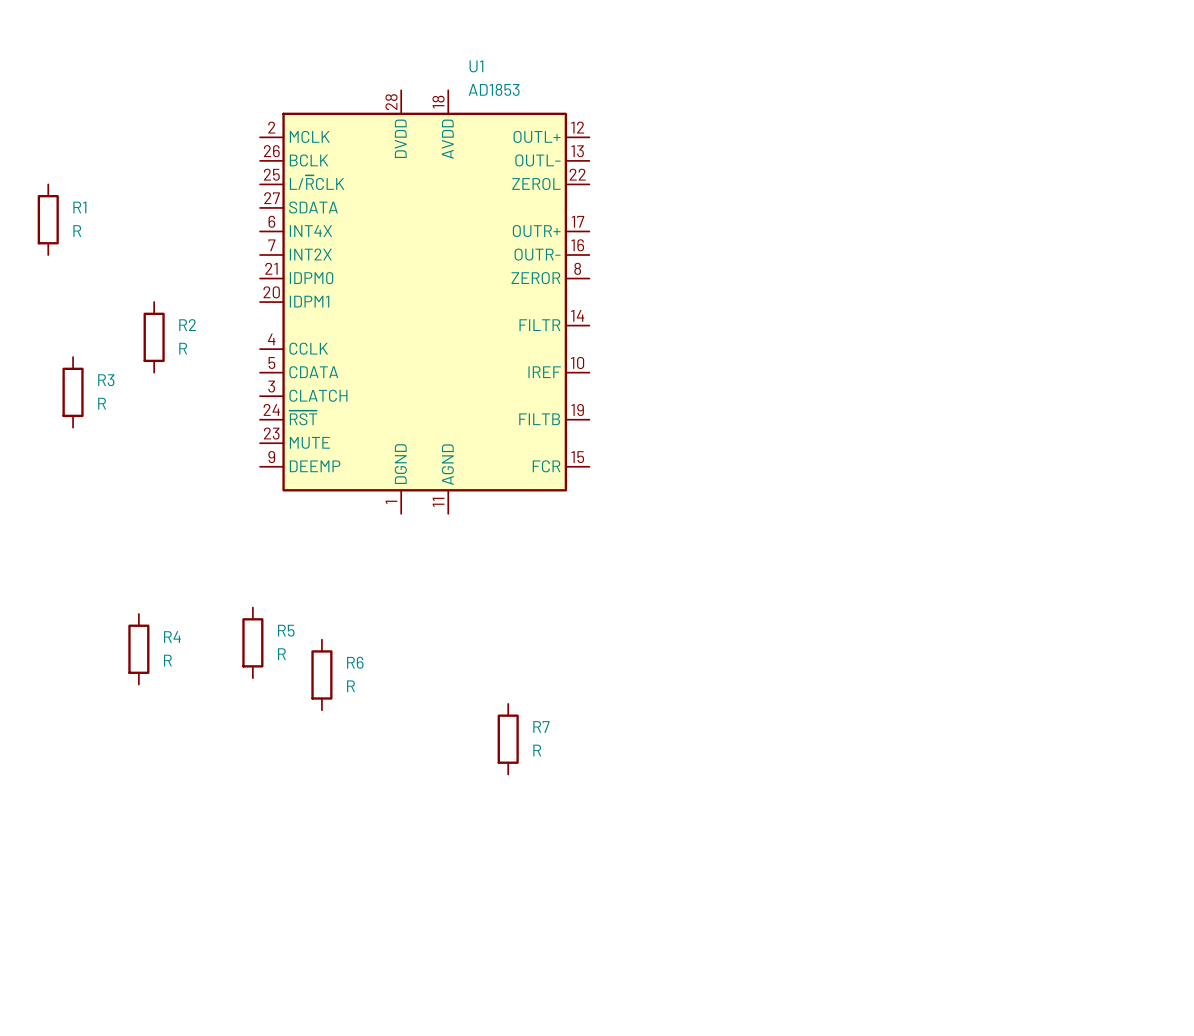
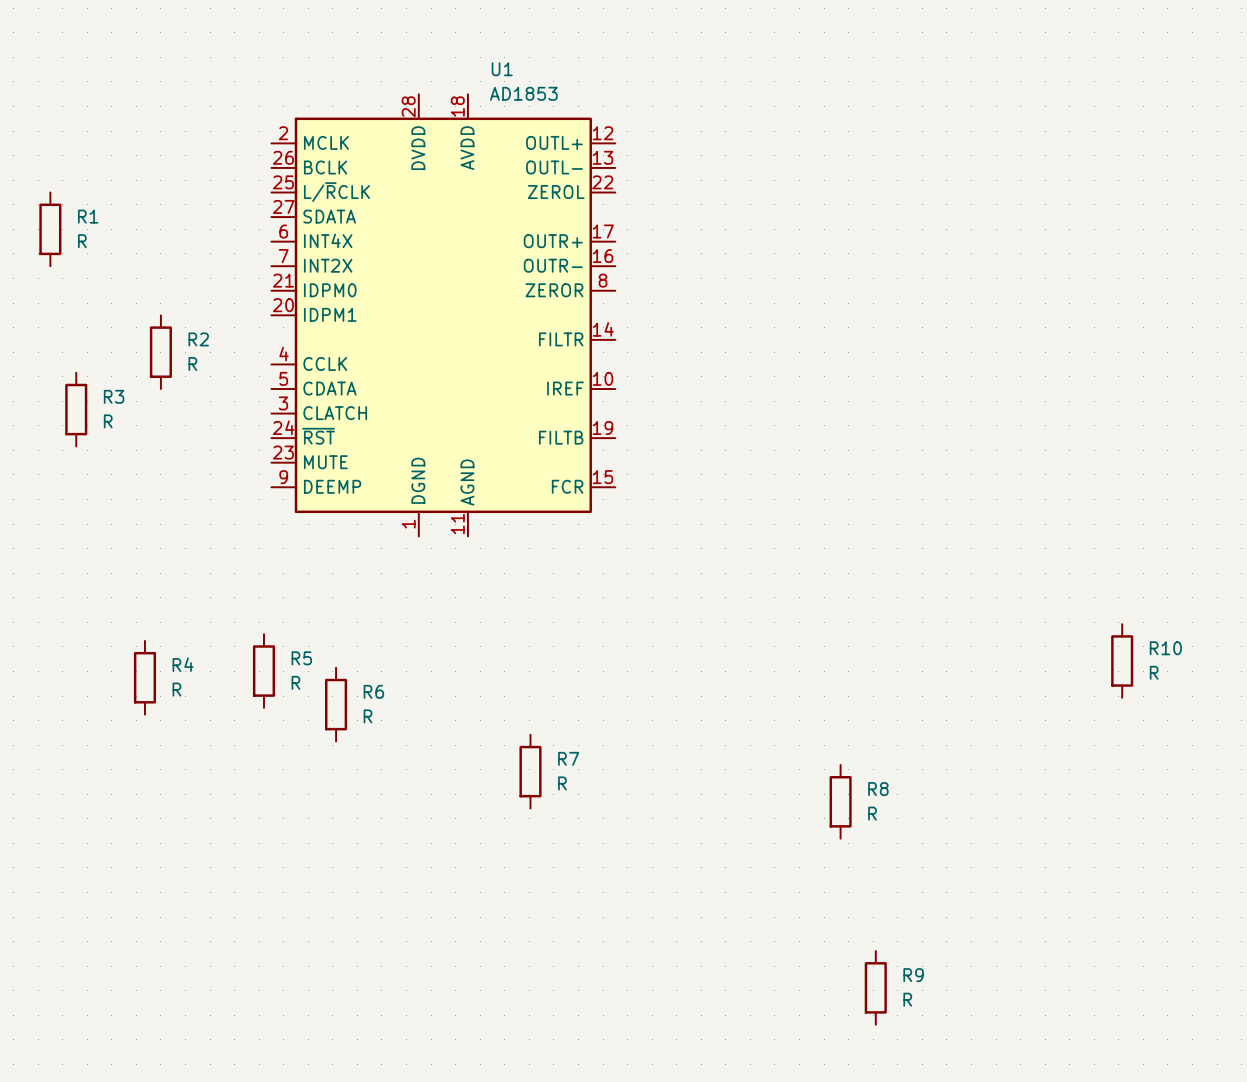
R10: none -> R (1122, 661)
R8: none -> R (840, 801)
R9: none -> R (875, 987)

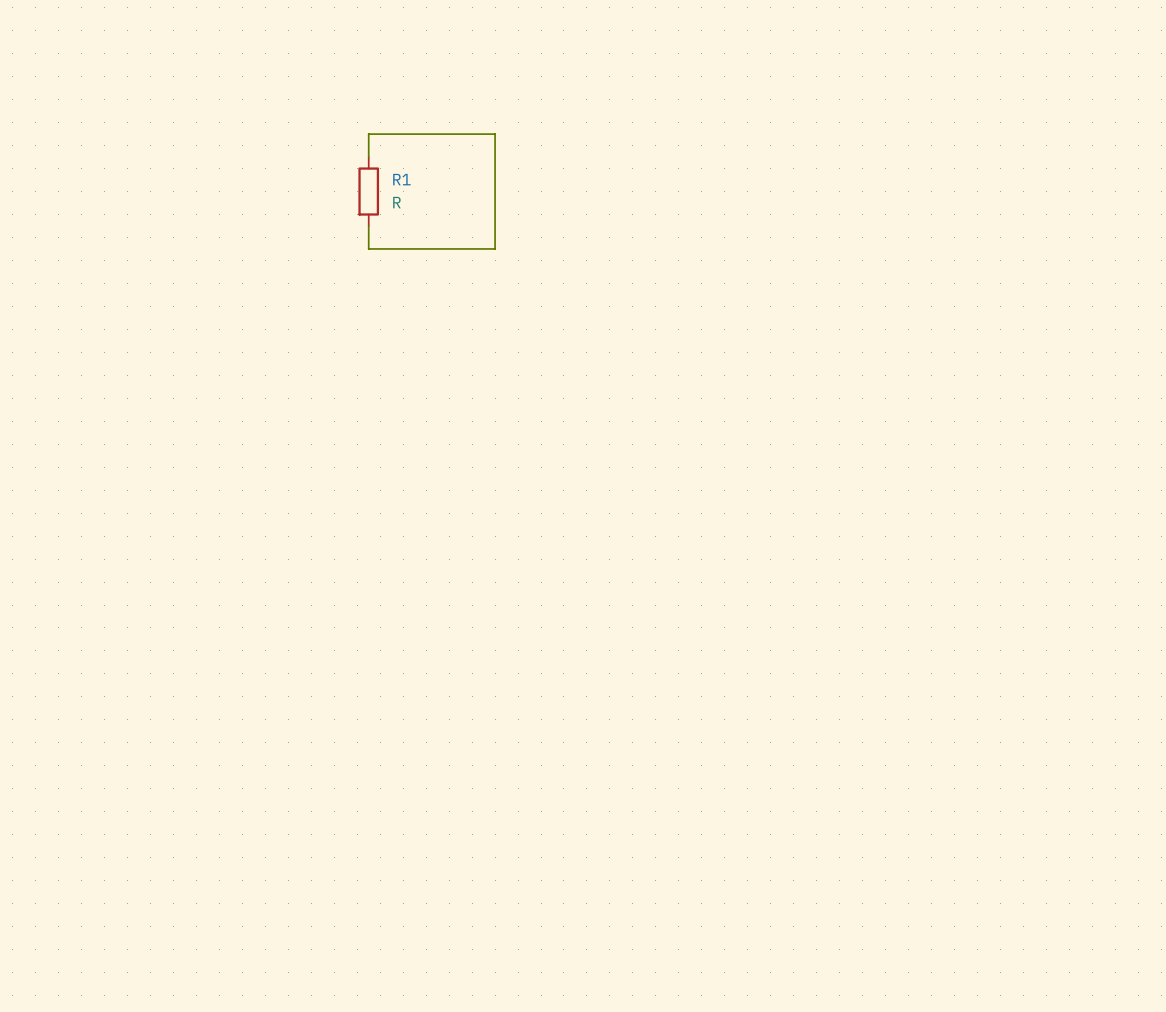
R1 position: (50, 229) -> (368, 191)
U1: AD1853 (443, 315) -> none
R2: R (160, 352) -> none
R3: R (76, 409) -> none
R10: R (1122, 661) -> none
R5: R (263, 671) -> none
R4: R (144, 677) -> none
R6: R (336, 704) -> none
R7: R (530, 771) -> none
R8: R (840, 801) -> none
R9: R (875, 987) -> none

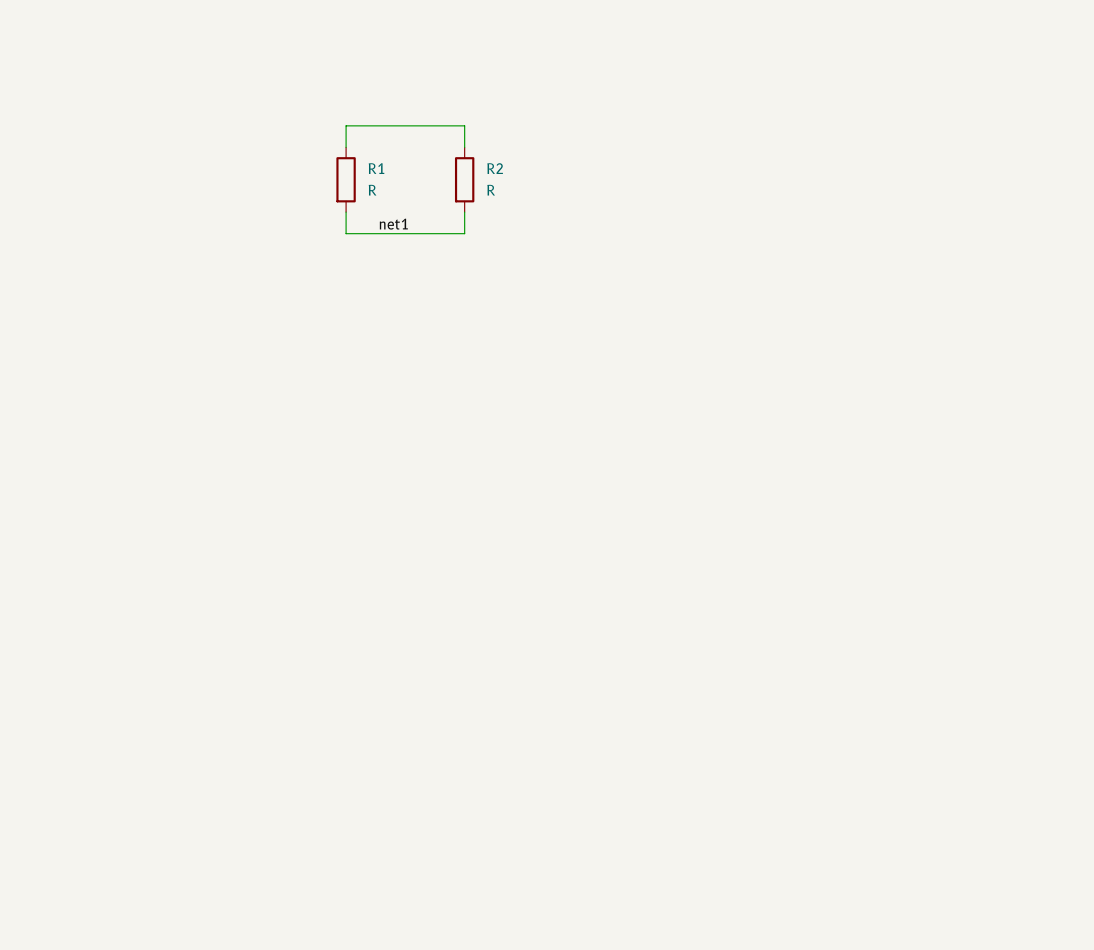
wire: (495, 157) (495, 225) -> none
R2: none -> R (464, 179)
label: none -> net1 (393, 224)

